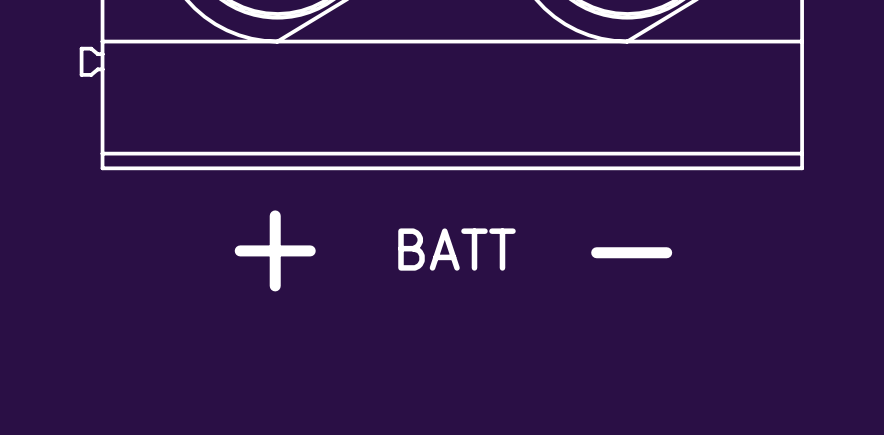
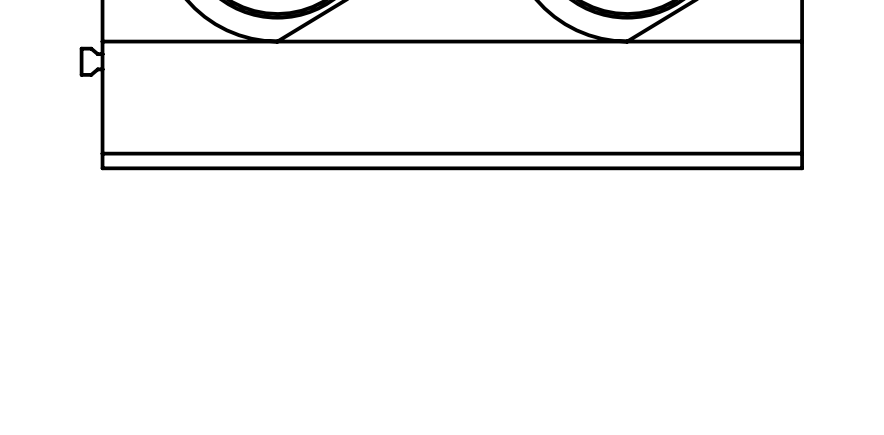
text: BATT (456, 249) -> none
text: + (275, 250) -> none
text: - (631, 252) -> none

